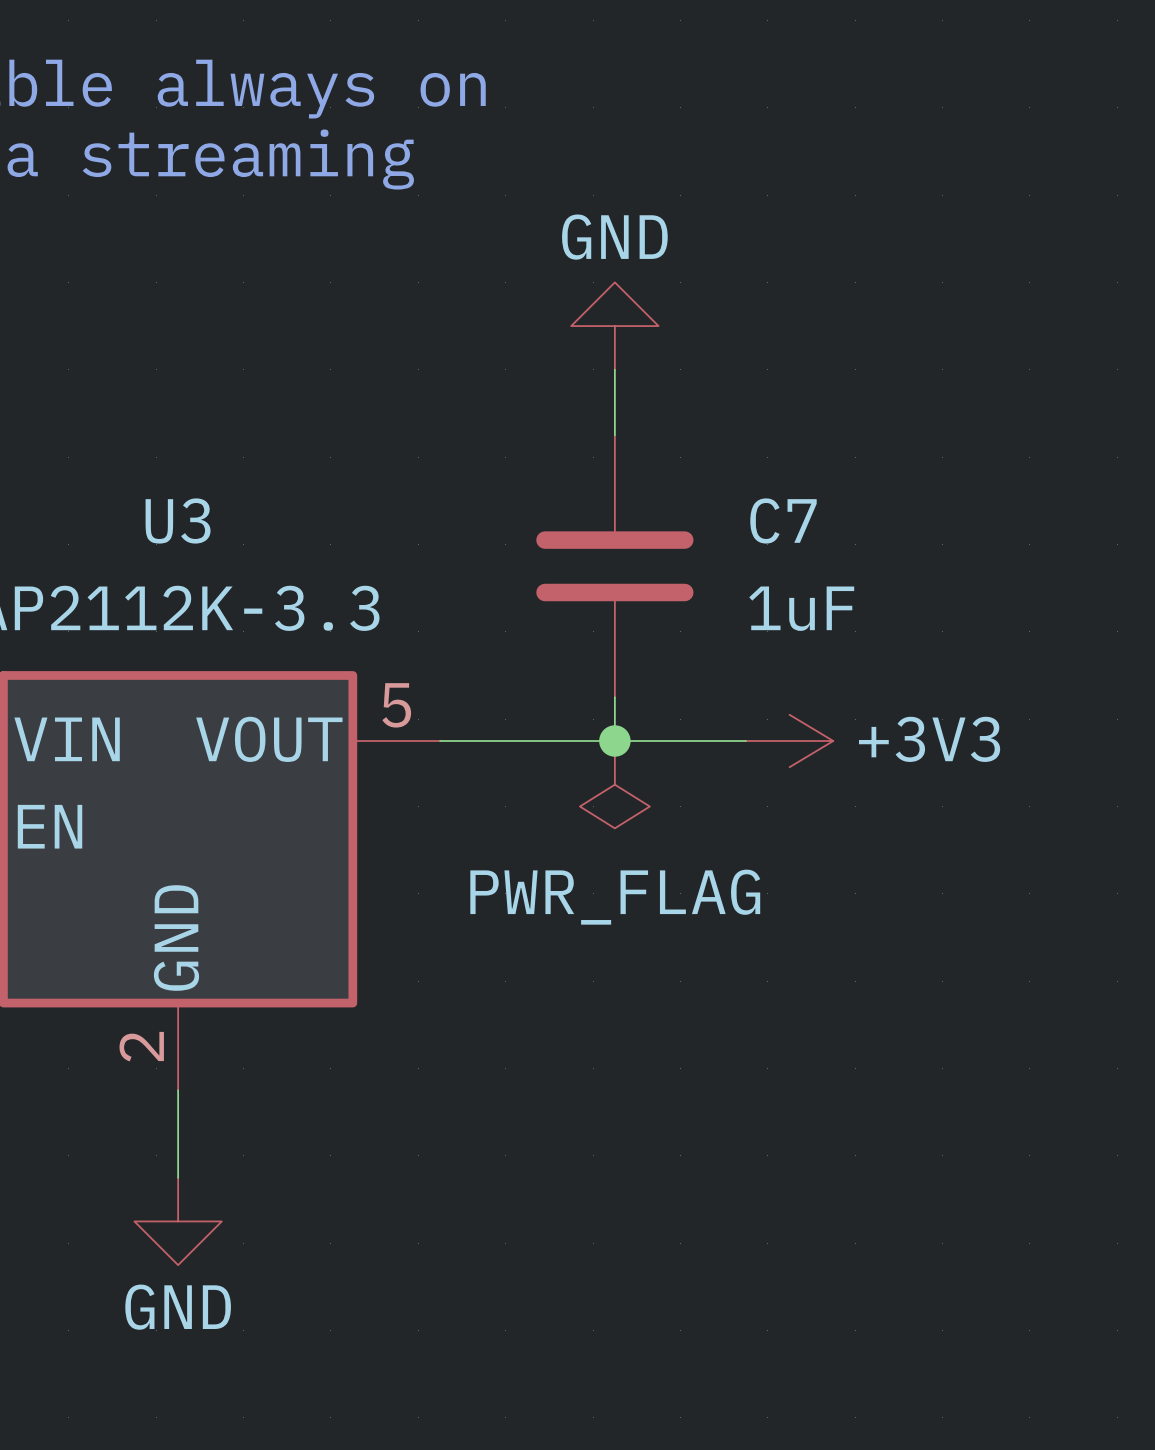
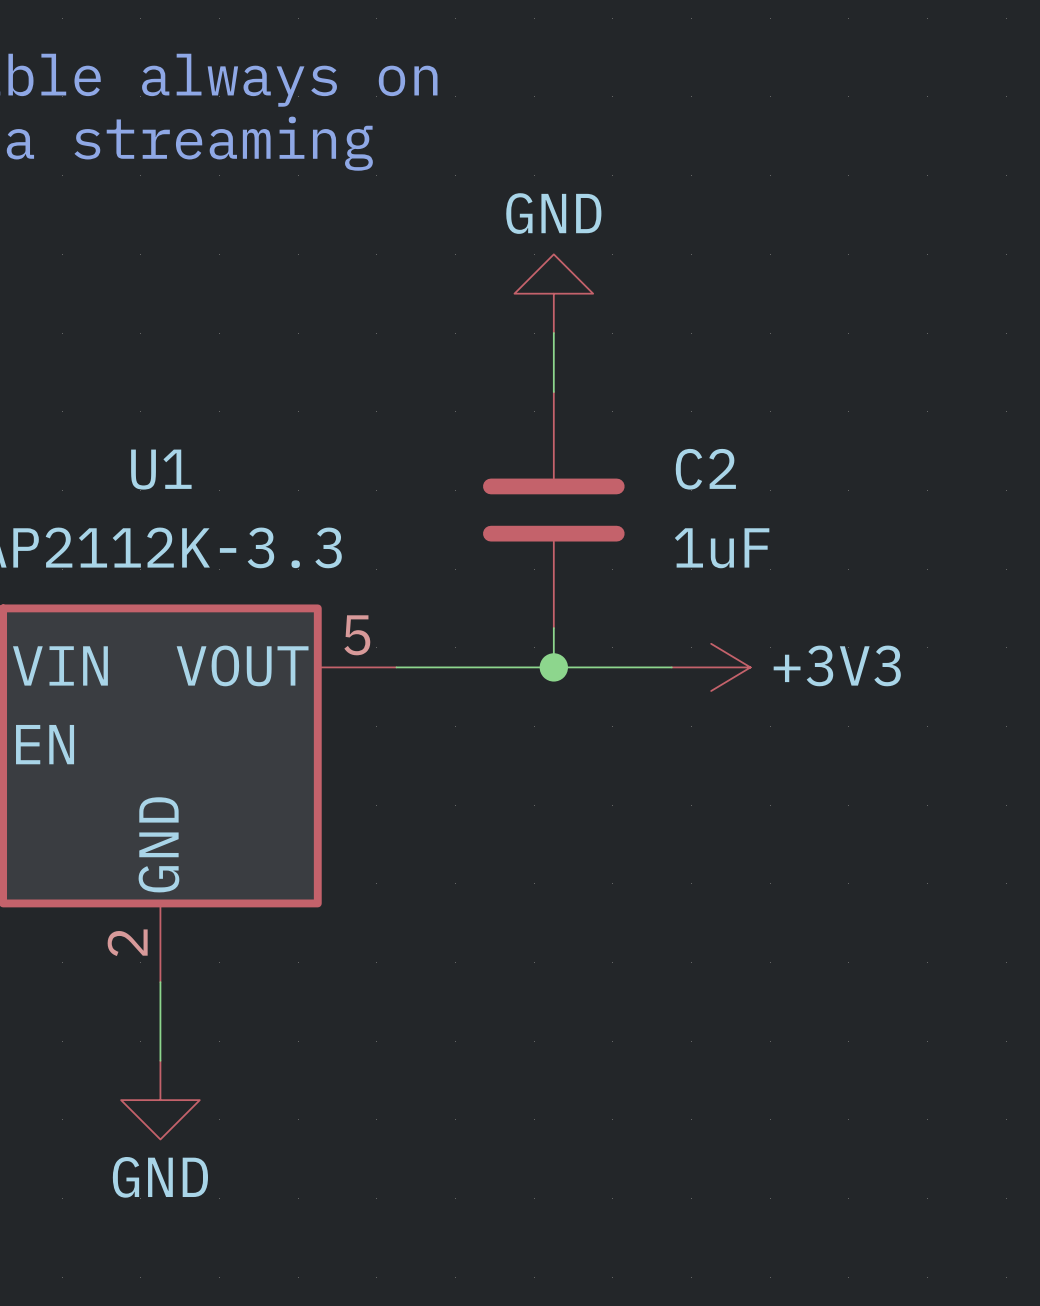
U3 name: U3 (178, 520) -> U1 (161, 469)
C7 name: C7 (783, 520) -> C2 (705, 469)
power symbol: PWR_FLAG (614, 784) -> none

